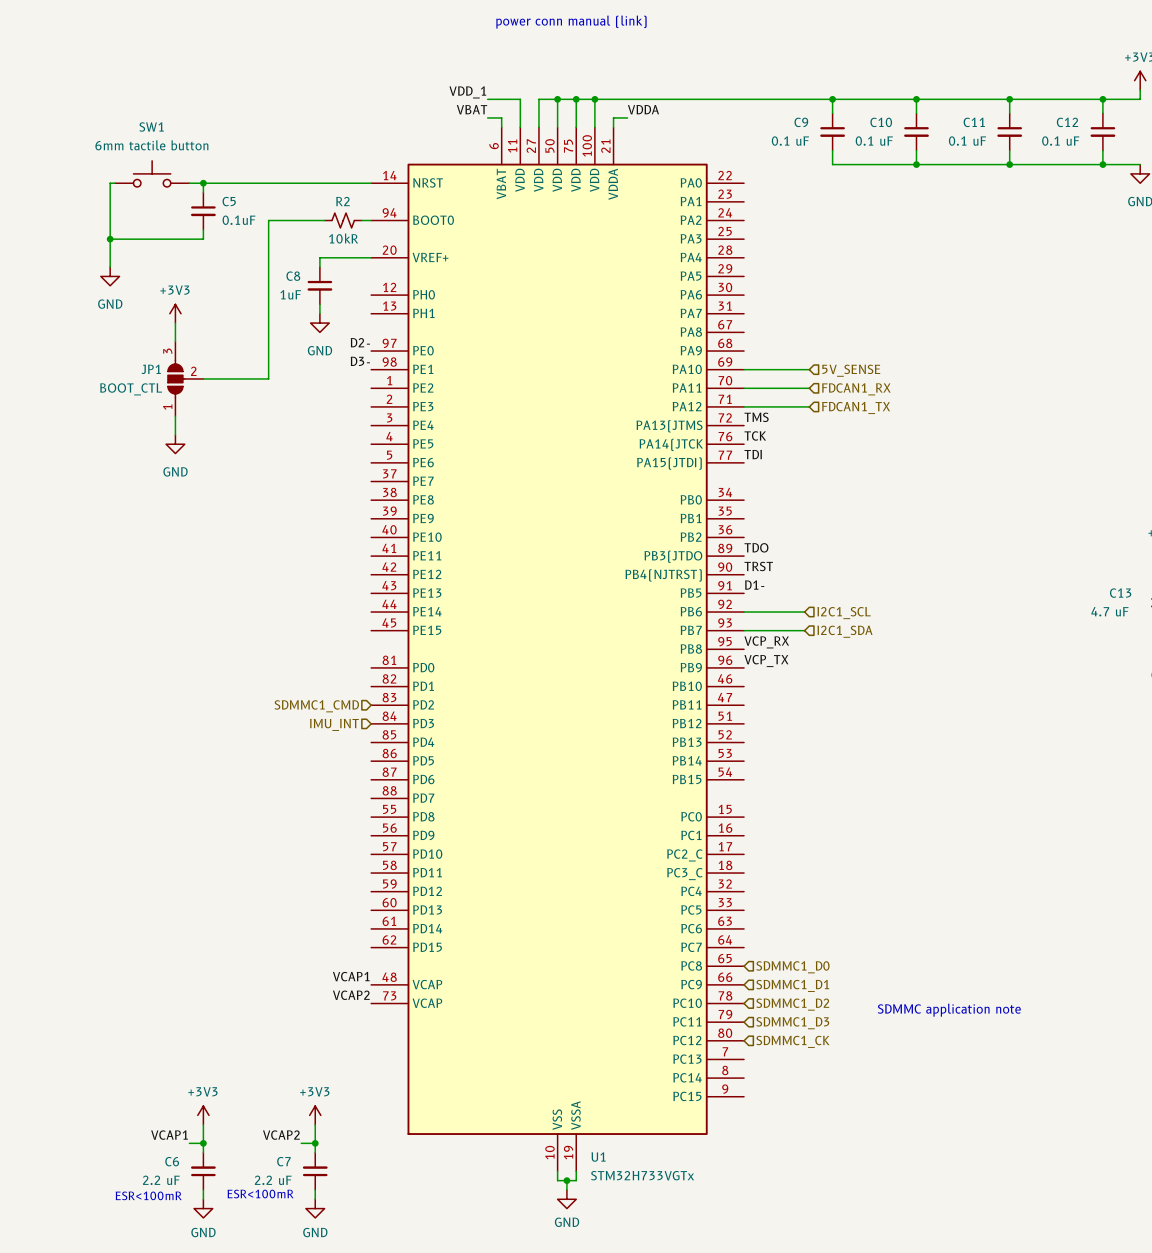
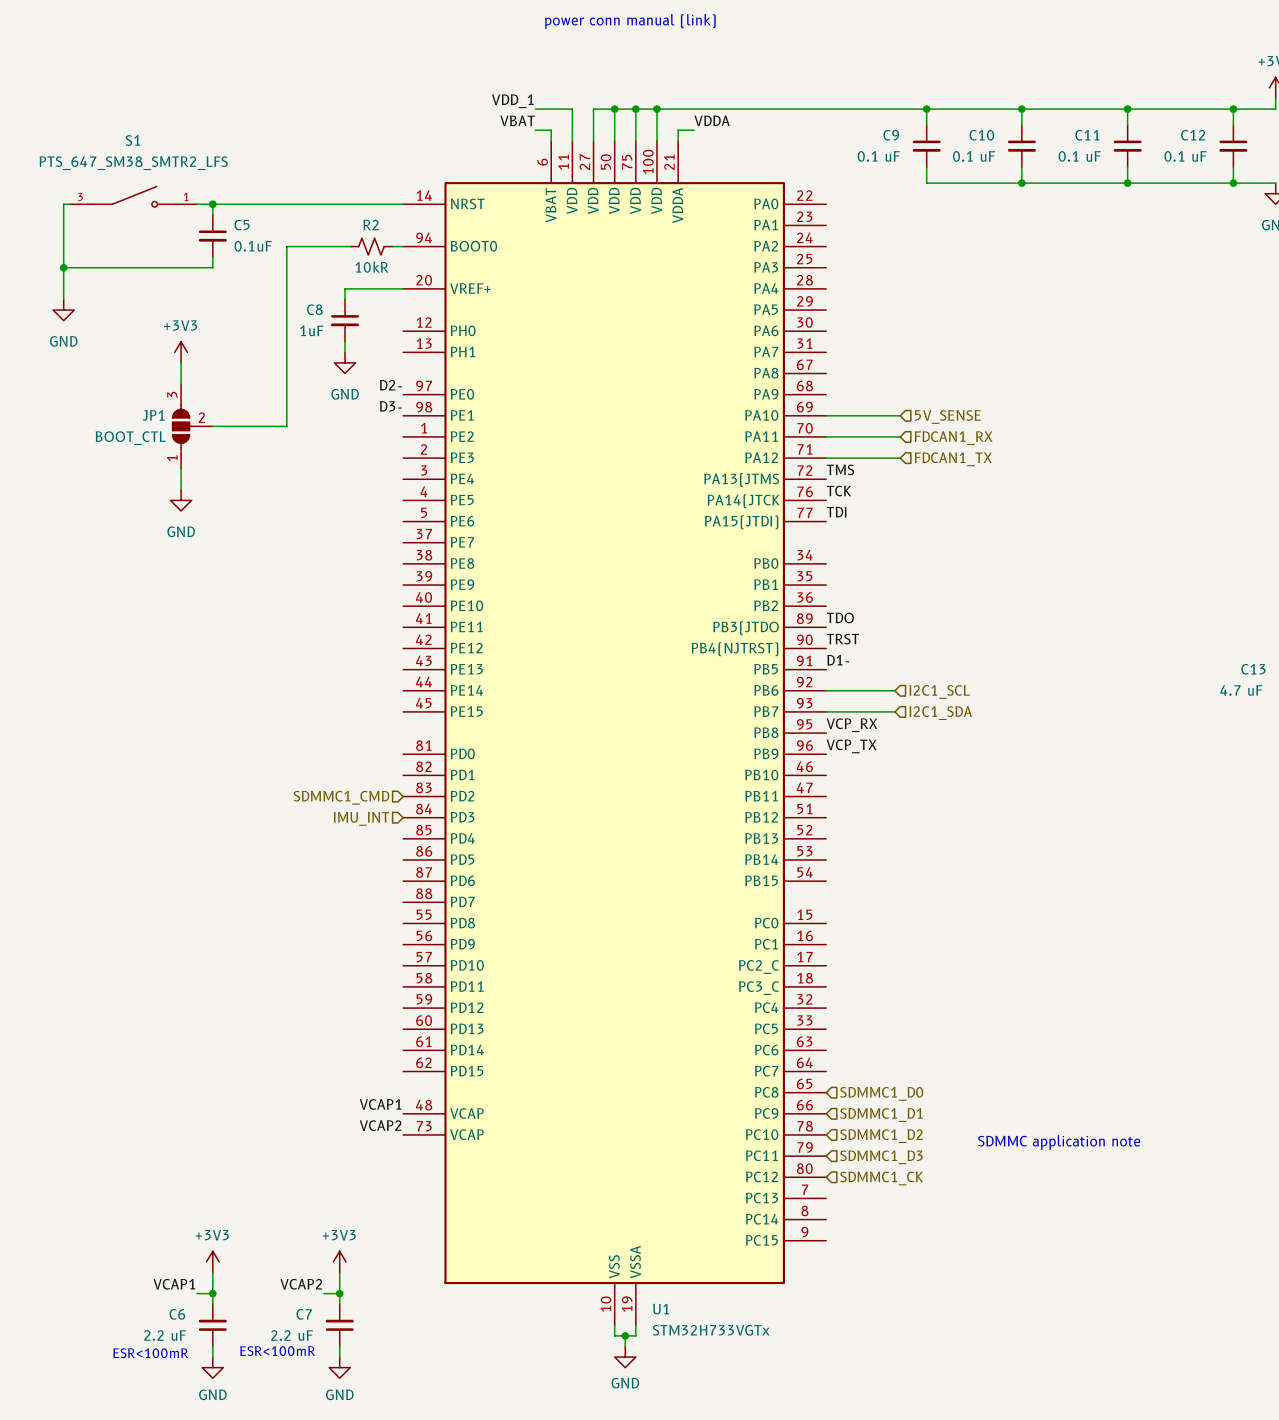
SW1: 6mm tactile button (152, 173) -> none
S1: none -> PTS_647_SM38_SMTR2_LFS (133, 196)
wire: none -> (70, 204) (63, 204) (63, 299)
wire: (114, 183) (110, 183) (110, 267) -> none
wire: none -> (63, 267) (107, 267)
junction position: (110, 239) -> (63, 267)
power symbol position: GND (110, 276) -> GND (63, 310)

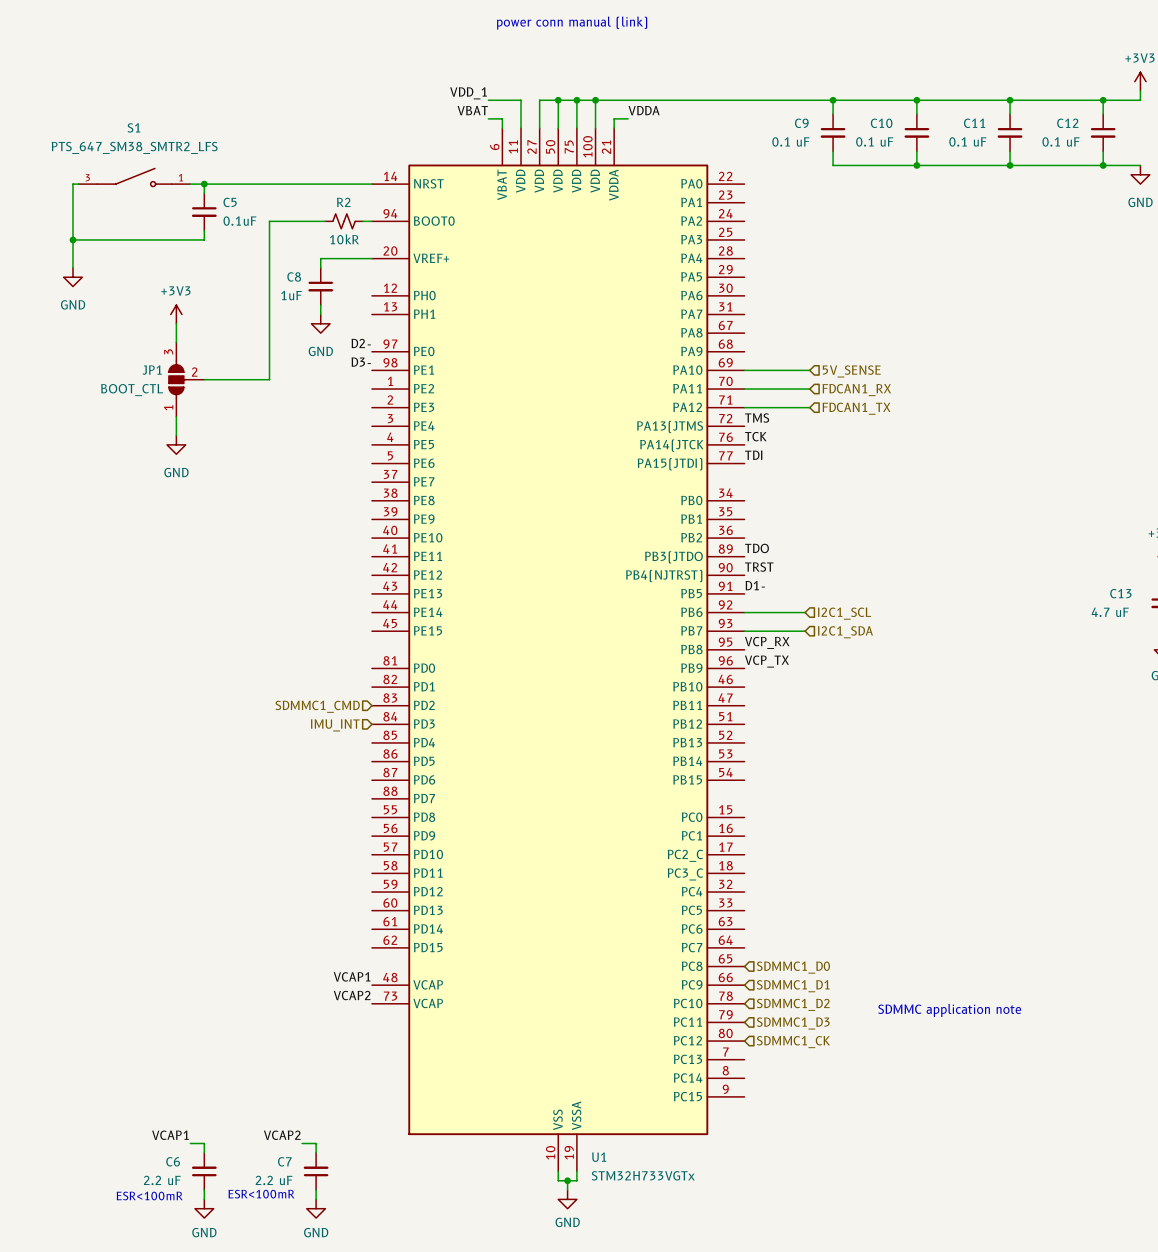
power symbol: +3V3 (212, 1261) -> none
power symbol: +3V3 (339, 1261) -> none
wire: (212, 1272) (212, 1293) -> none
wire: (339, 1272) (339, 1293) -> none
junction: (212, 1293) -> none
junction: (339, 1293) -> none

